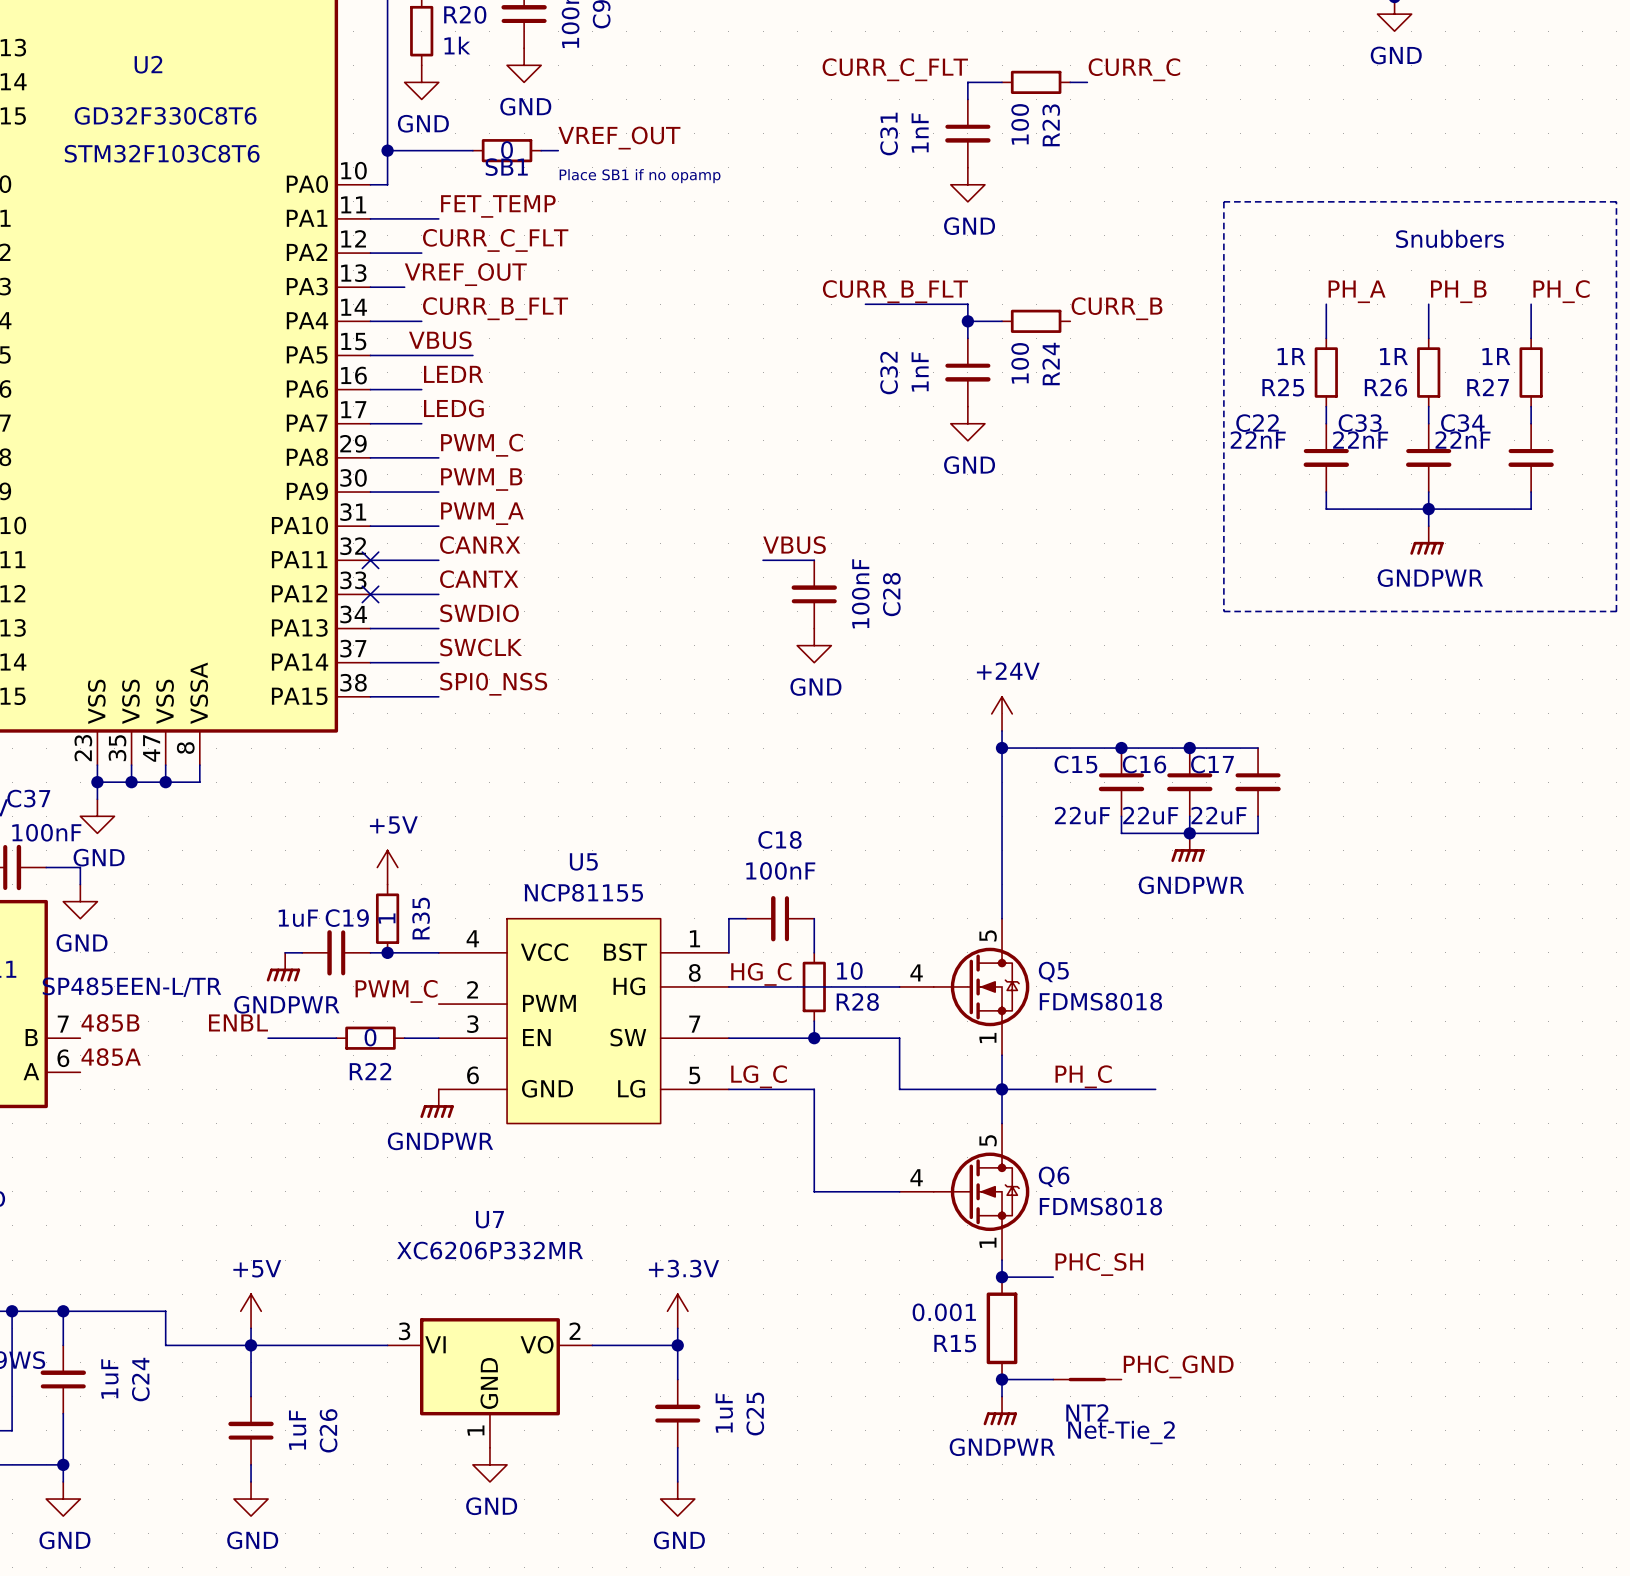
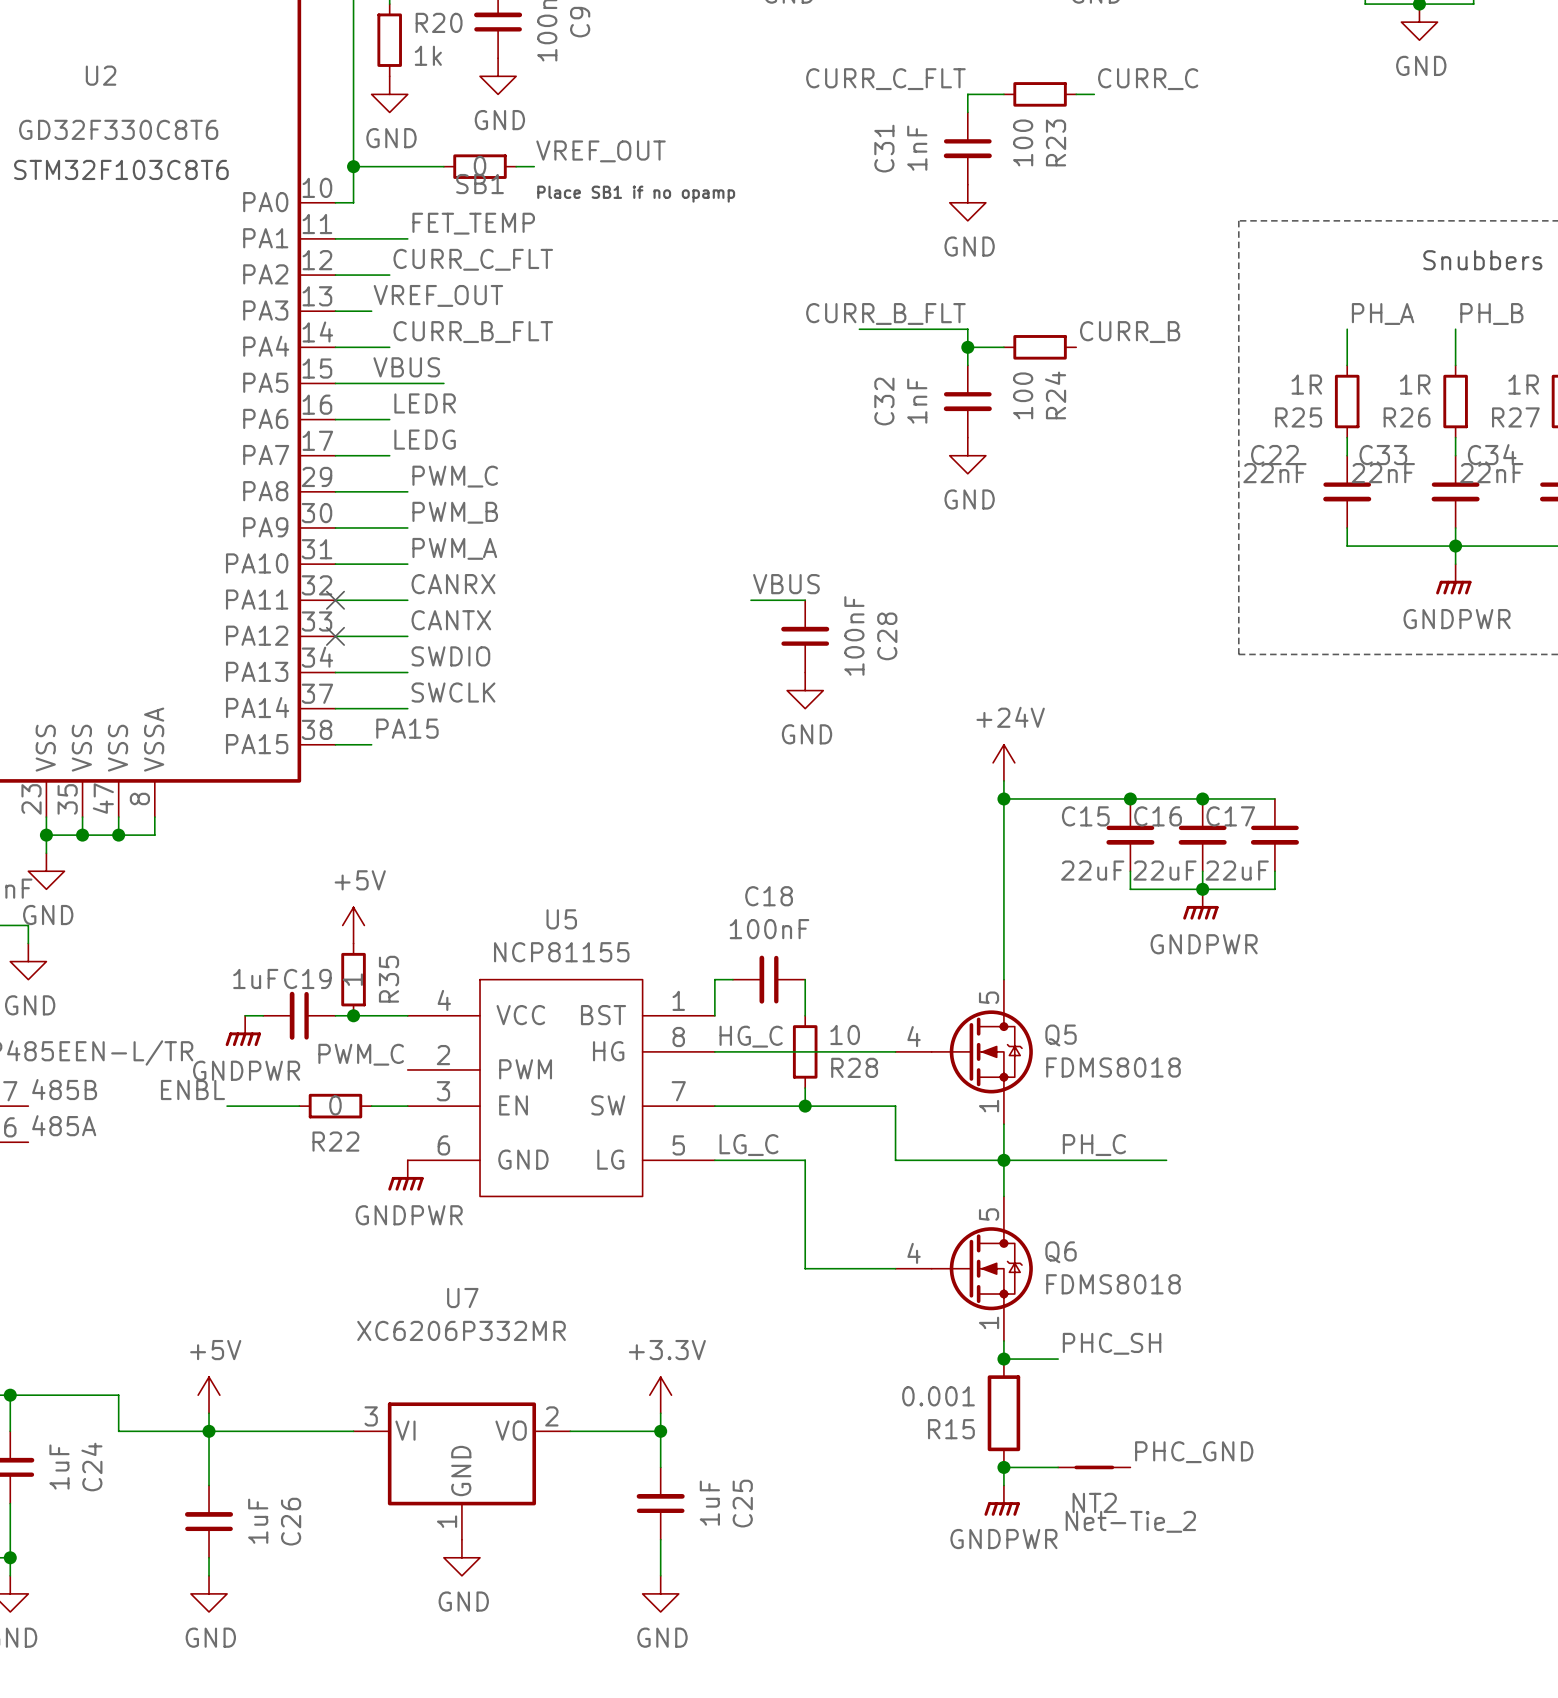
label: none -> PA15 (407, 728)
label: SPI0_NSS (493, 684) -> none
wire: (404, 696) (438, 696) -> none

